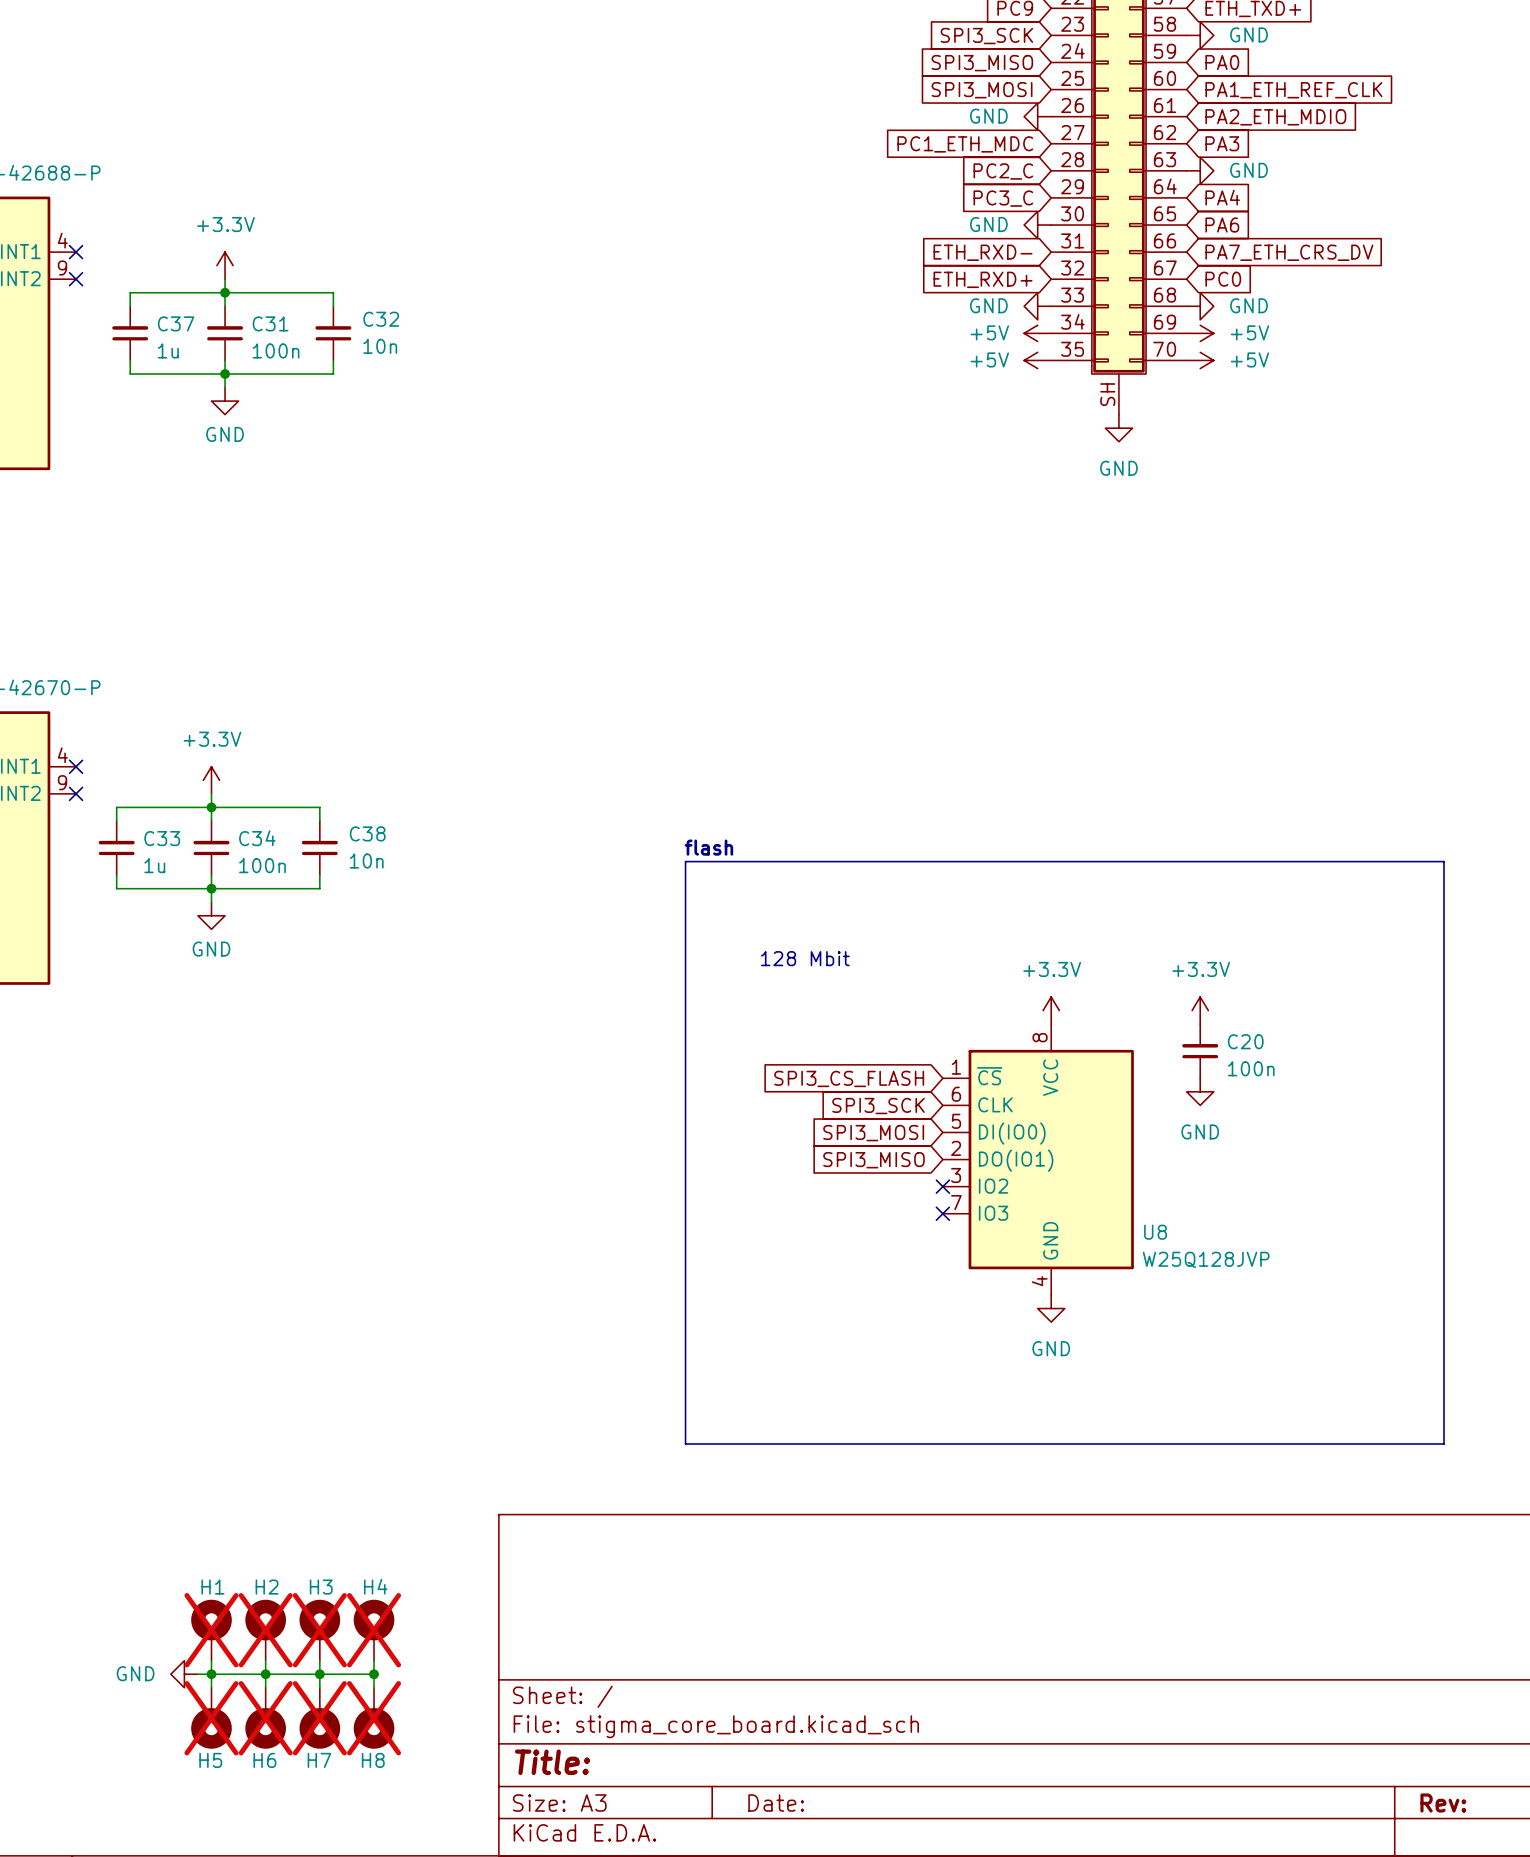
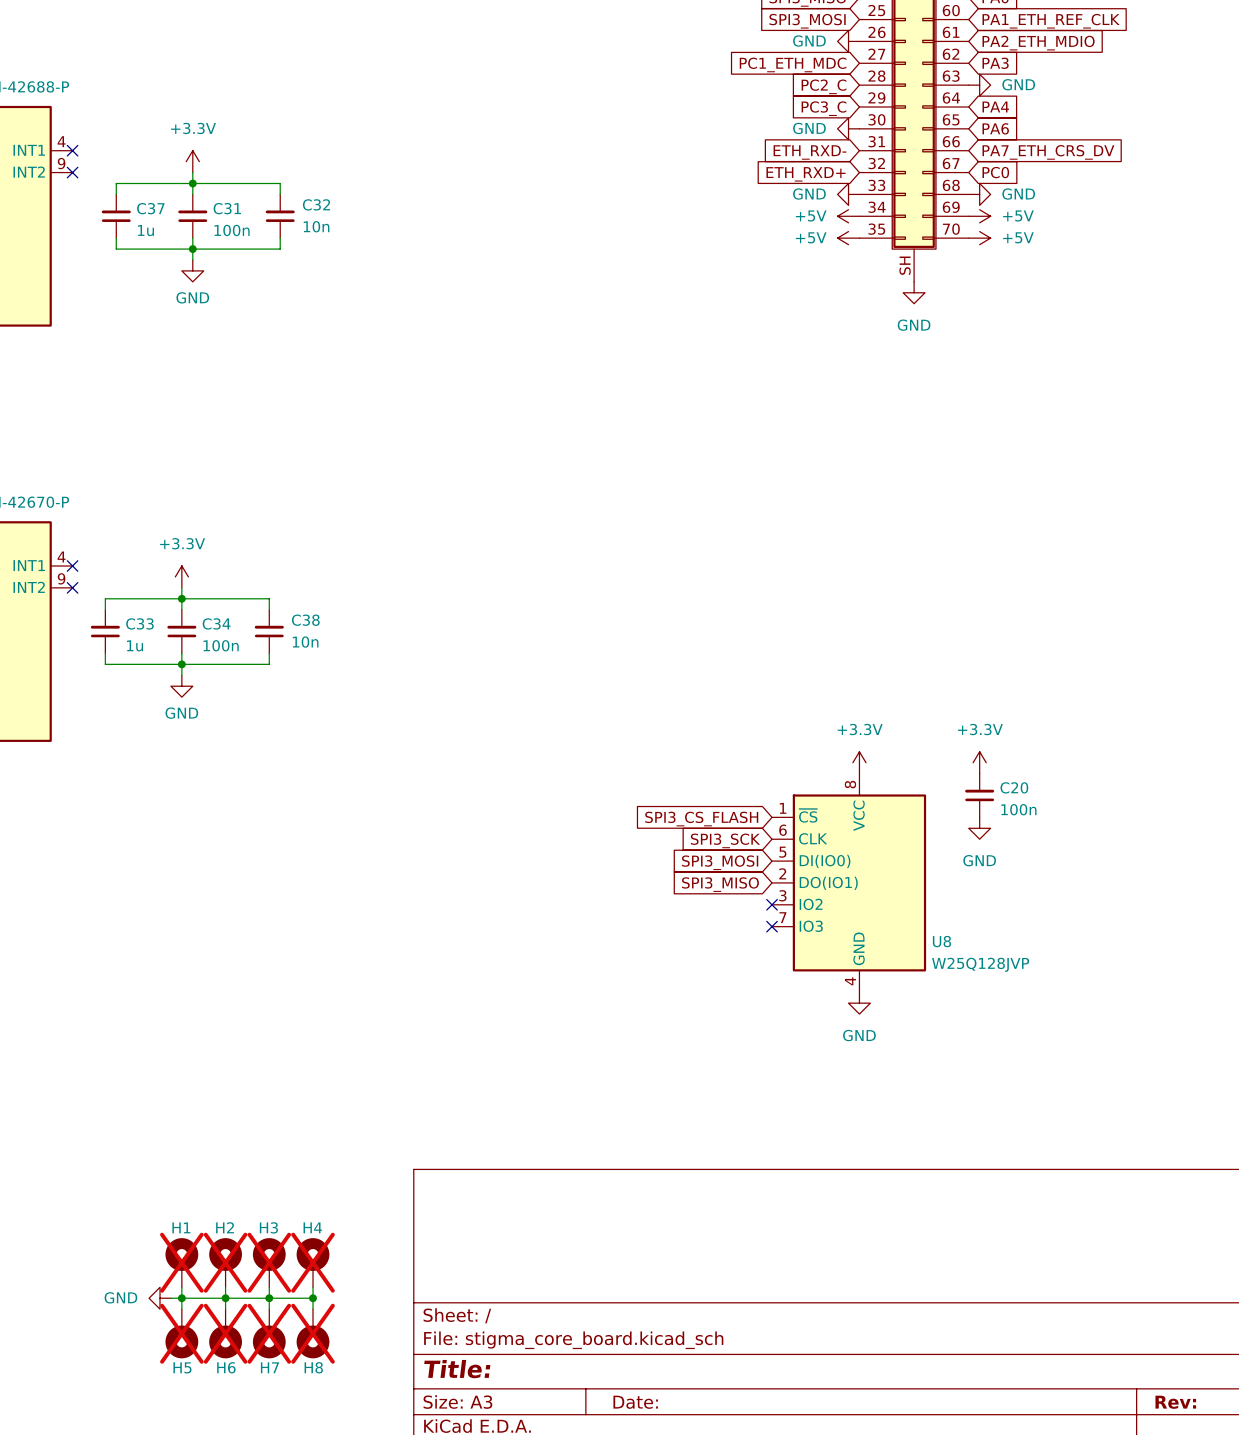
text: flash (708, 847) -> none
line: (685, 861) (1444, 861) (1444, 1443) (685, 1443) (685, 861) -> none
text: 128 Mbit (805, 958) -> none

